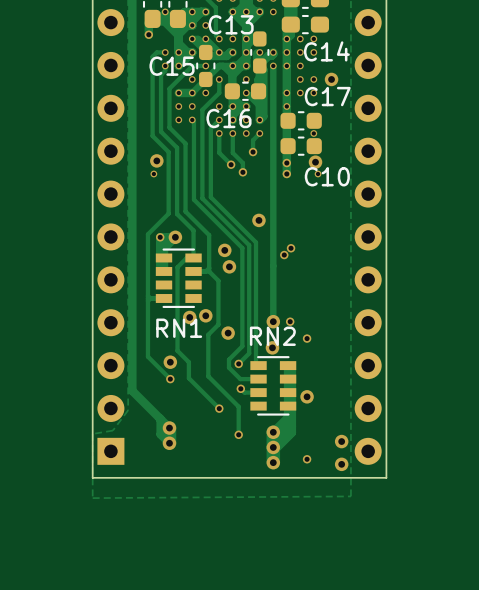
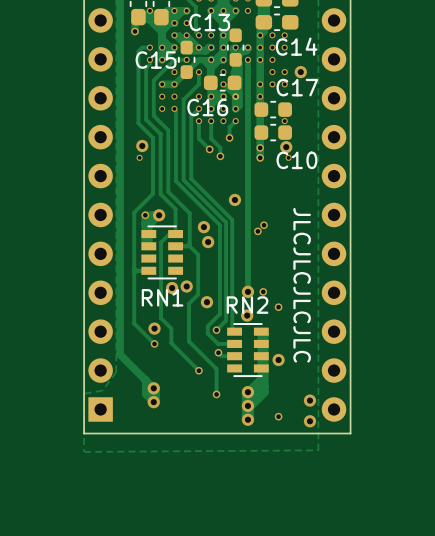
via: (205, 92) -> none
via: none -> (235, 96)
text: none -> JLCJLCJLCJLC (302, 285)

